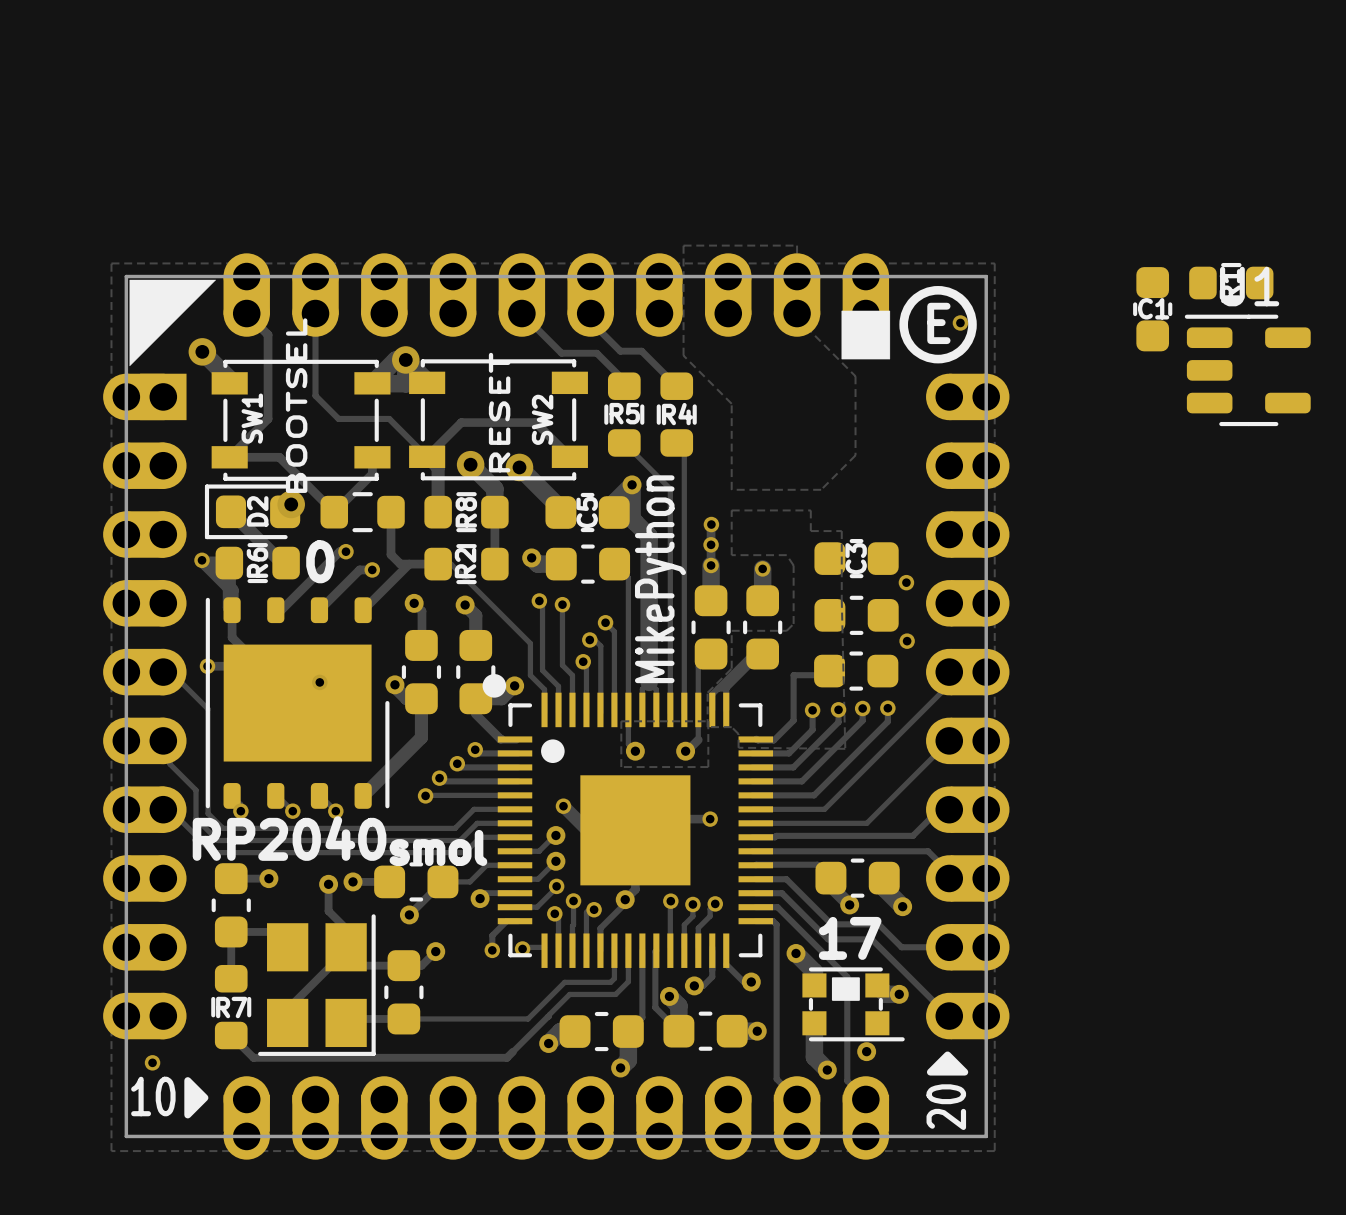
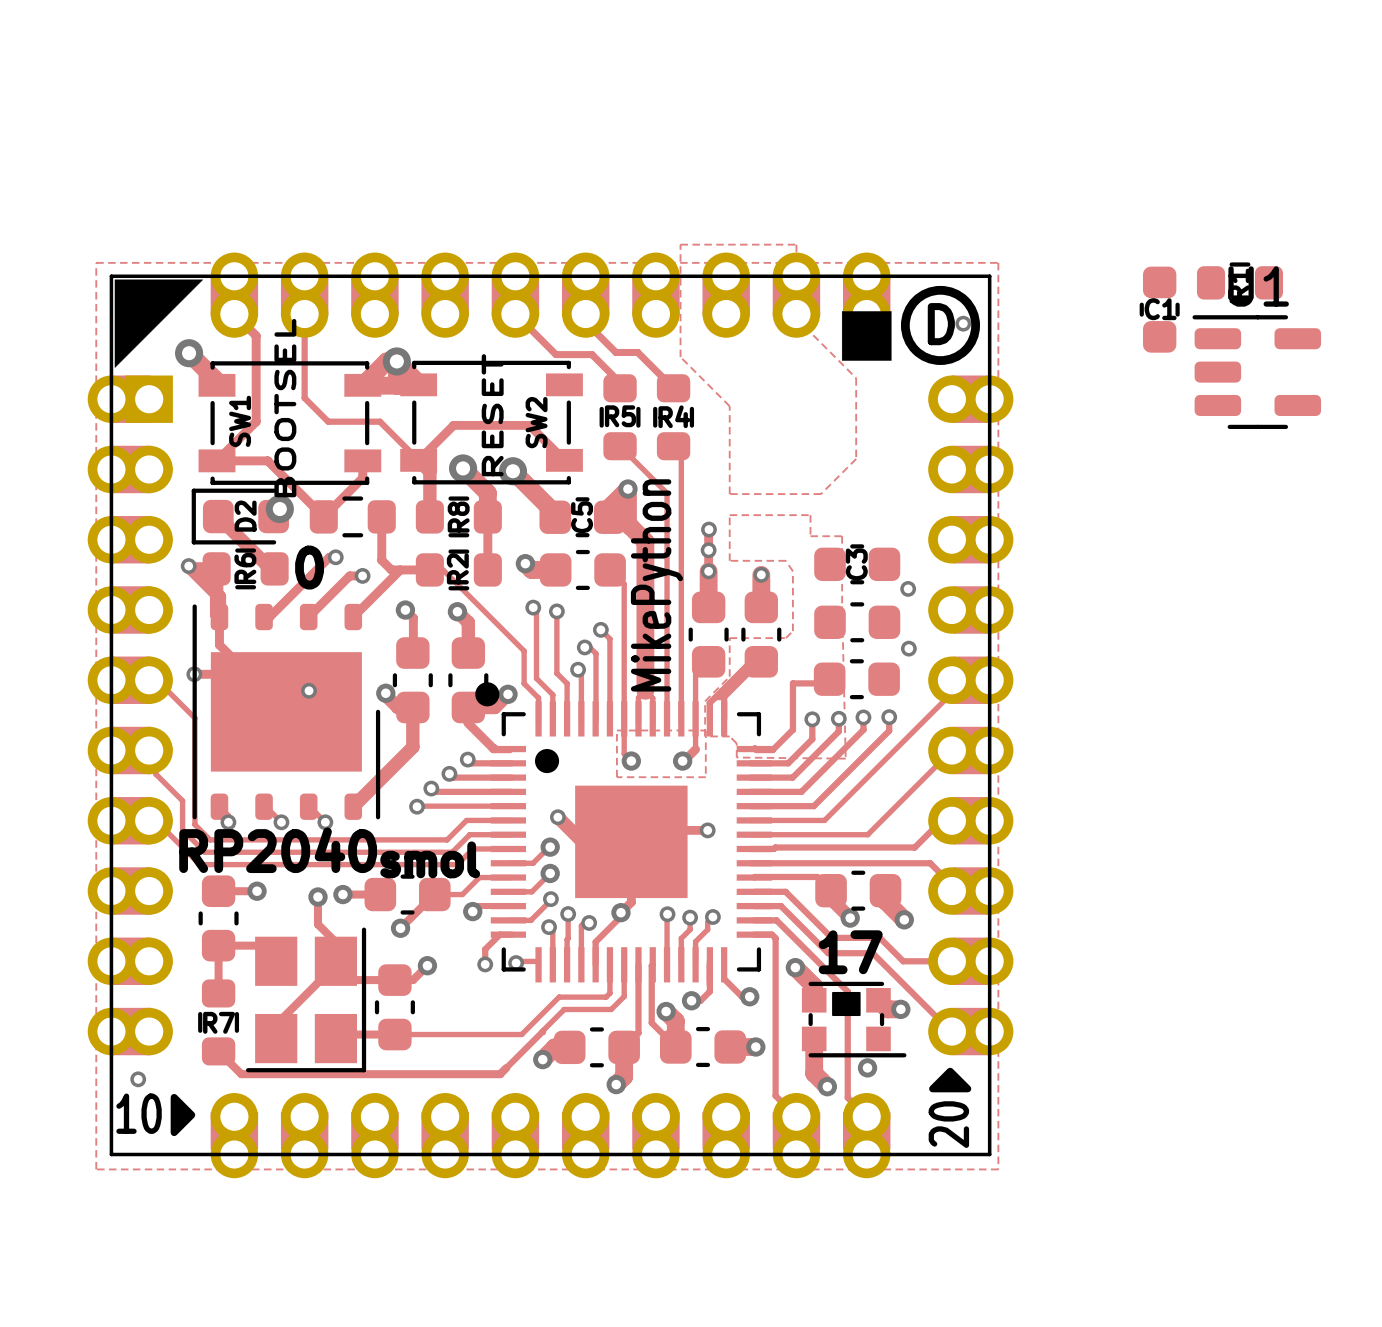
drawing shape: [899, 286, 977, 364] -> [900, 285, 981, 365]

